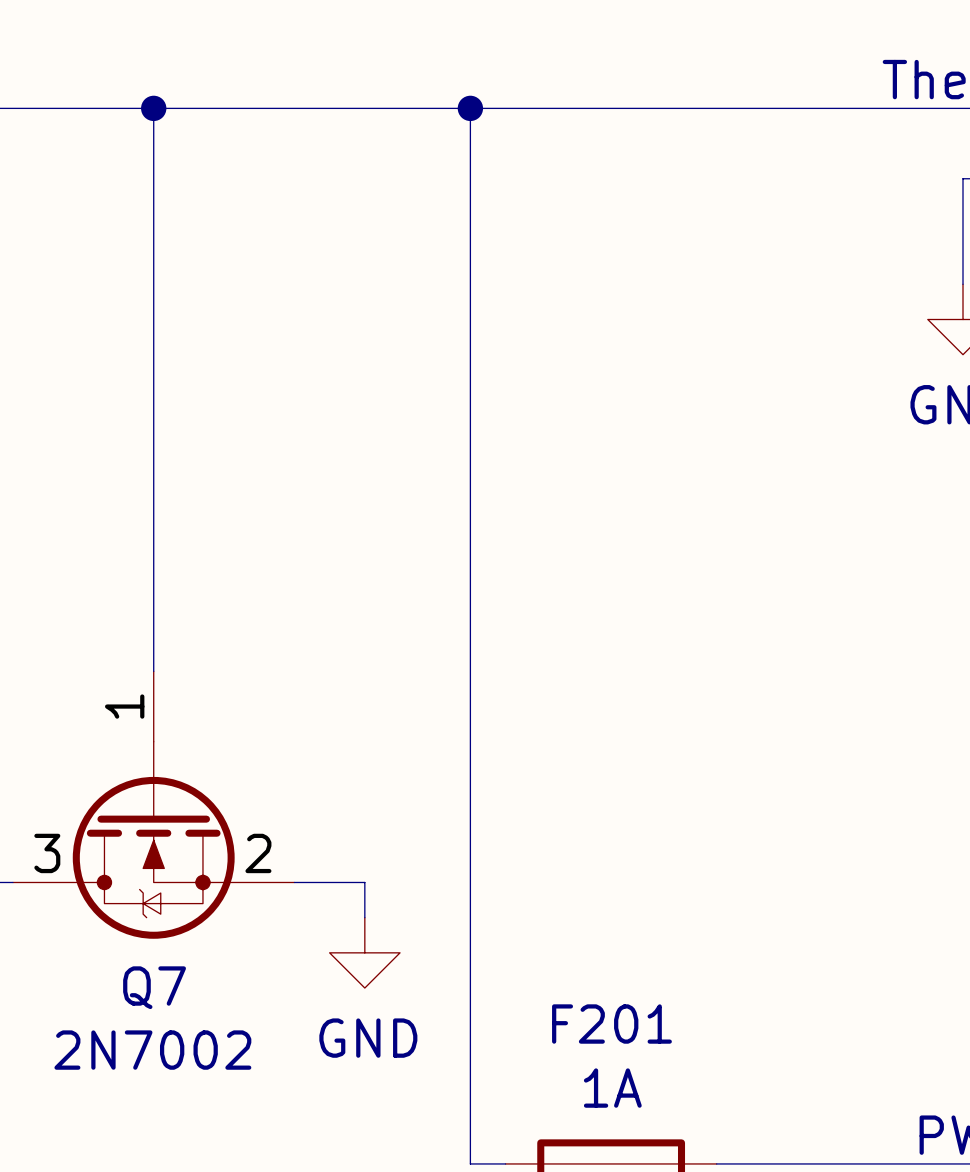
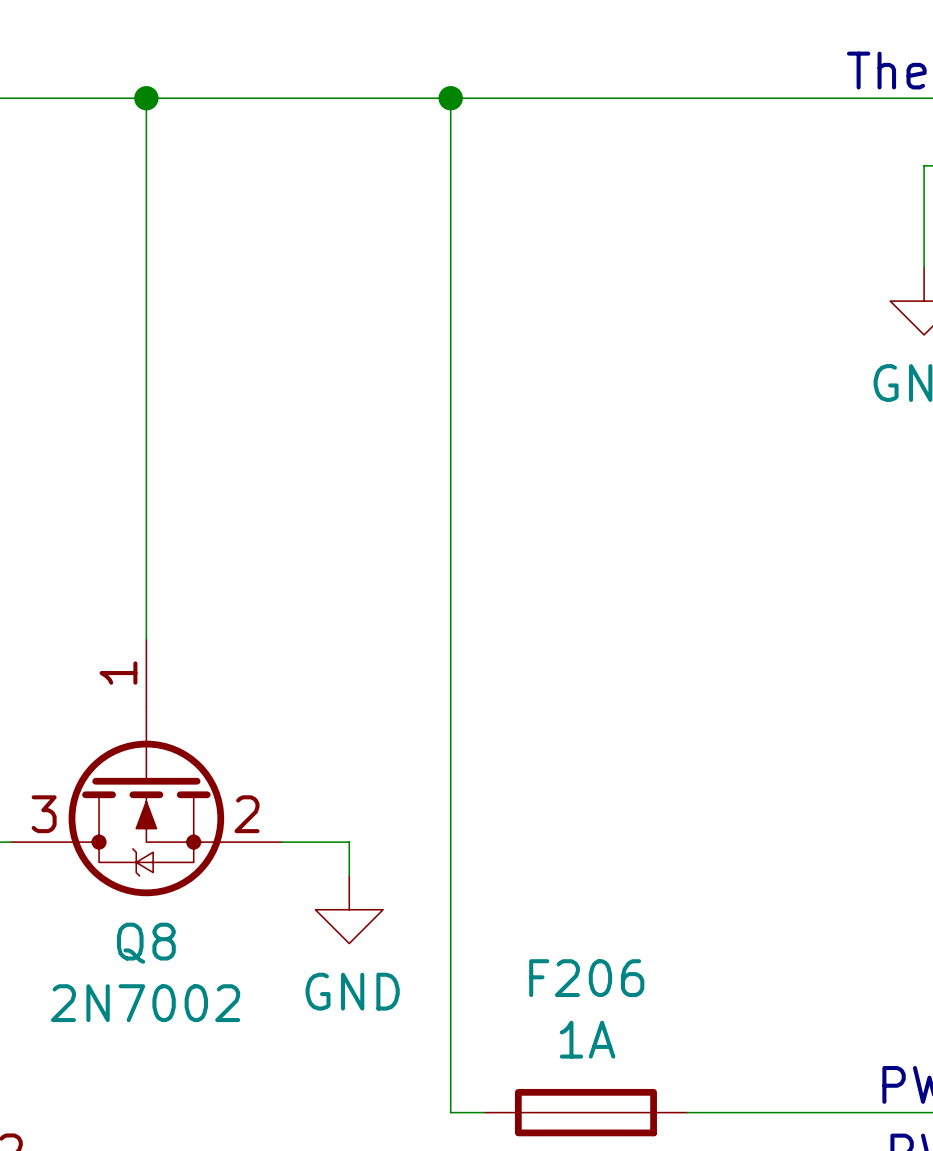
Q7 name: Q7 (154, 987) -> Q8 (146, 943)
F201 name: F201 (611, 1024) -> F206 (586, 978)

